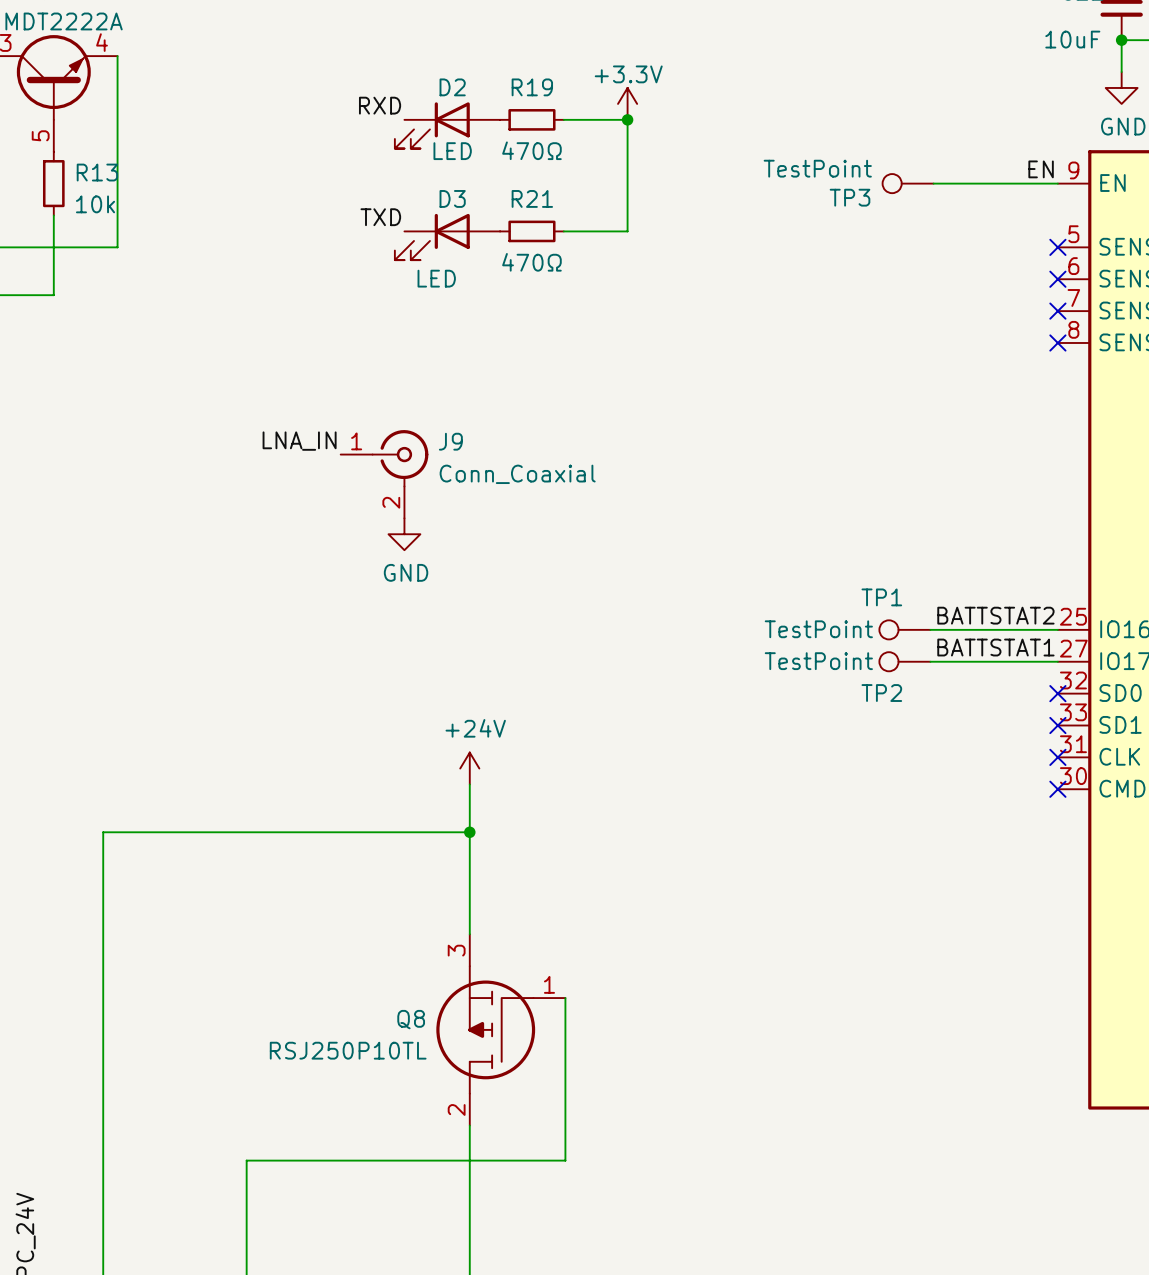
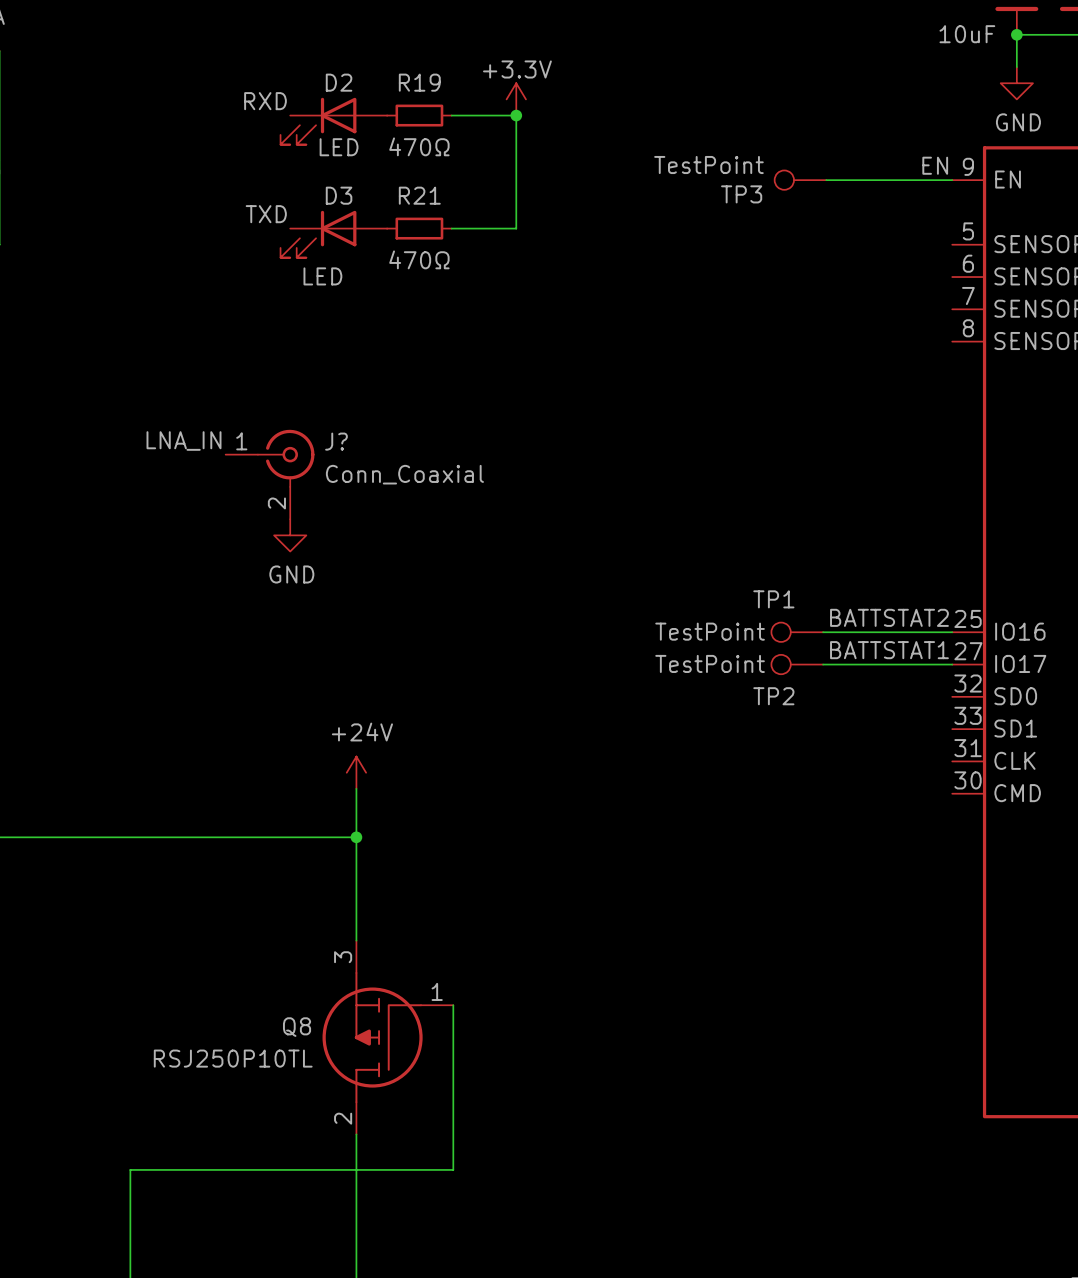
no-connect mark: (1057, 247) -> none
no-connect mark: (1057, 279) -> none
no-connect mark: (1057, 311) -> none
no-connect mark: (1057, 342) -> none
J9 name: J9 (450, 441) -> J? (336, 441)
no-connect mark: (1057, 693) -> none
no-connect mark: (1057, 725) -> none
no-connect mark: (1057, 757) -> none
no-connect mark: (1057, 789) -> none

